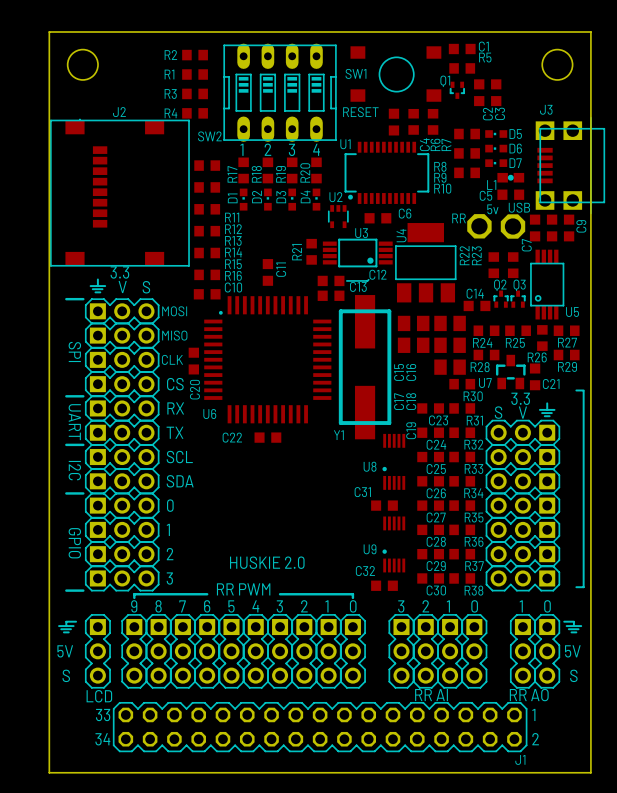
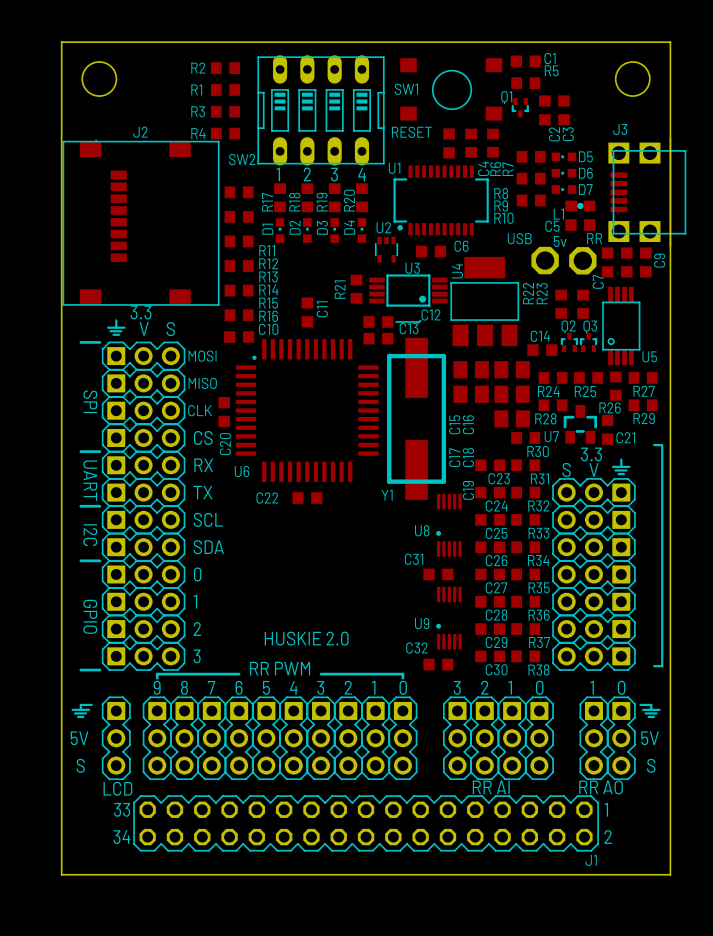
text: none -> USB (519, 238)
text: USB (519, 207) -> RR (594, 238)
text: RR (459, 218) -> none

